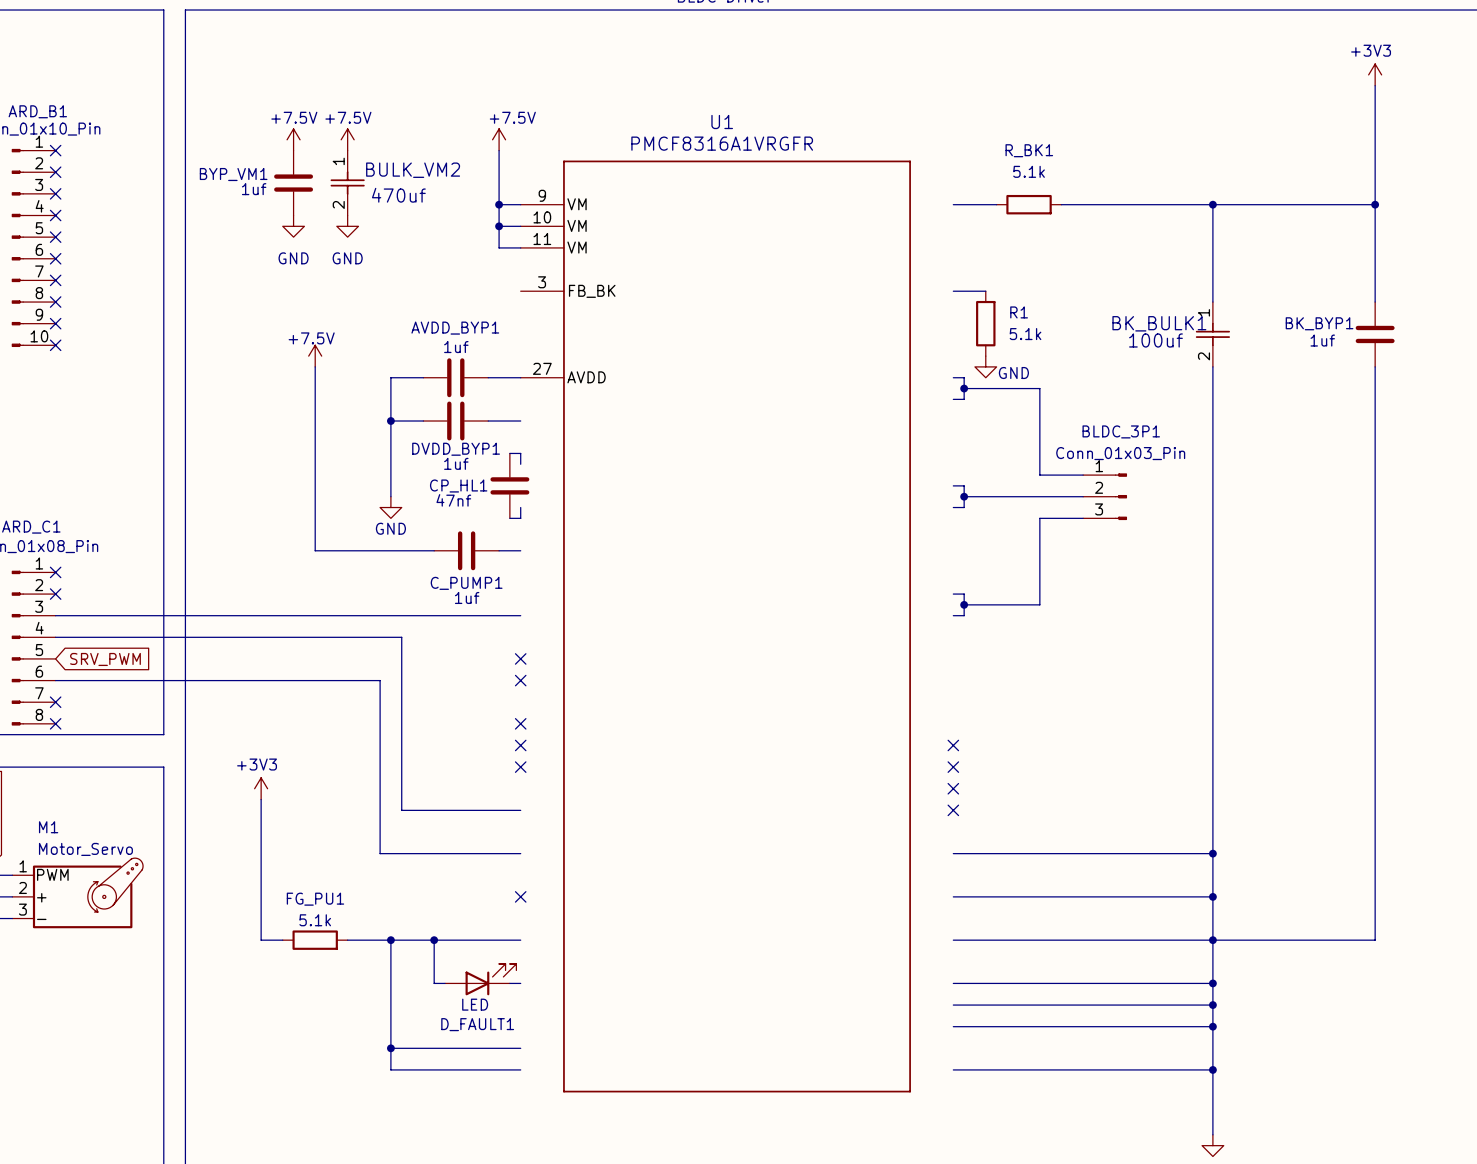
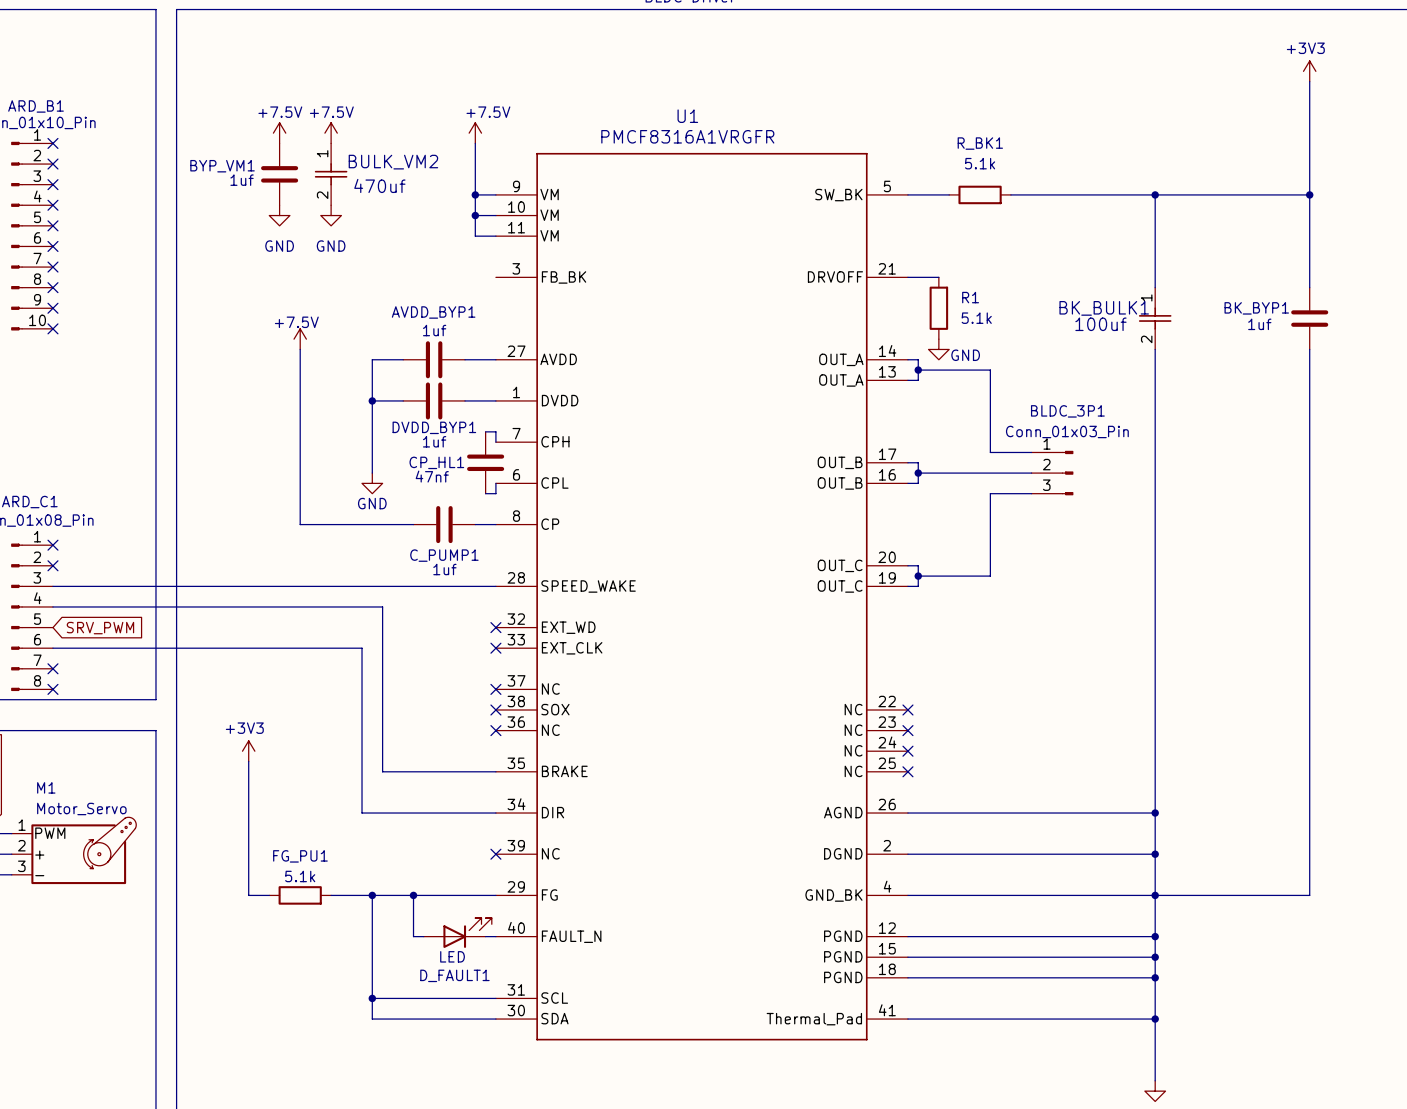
U1 symbol: [520, 160, 911, 1093] -> [495, 152, 908, 1041]

